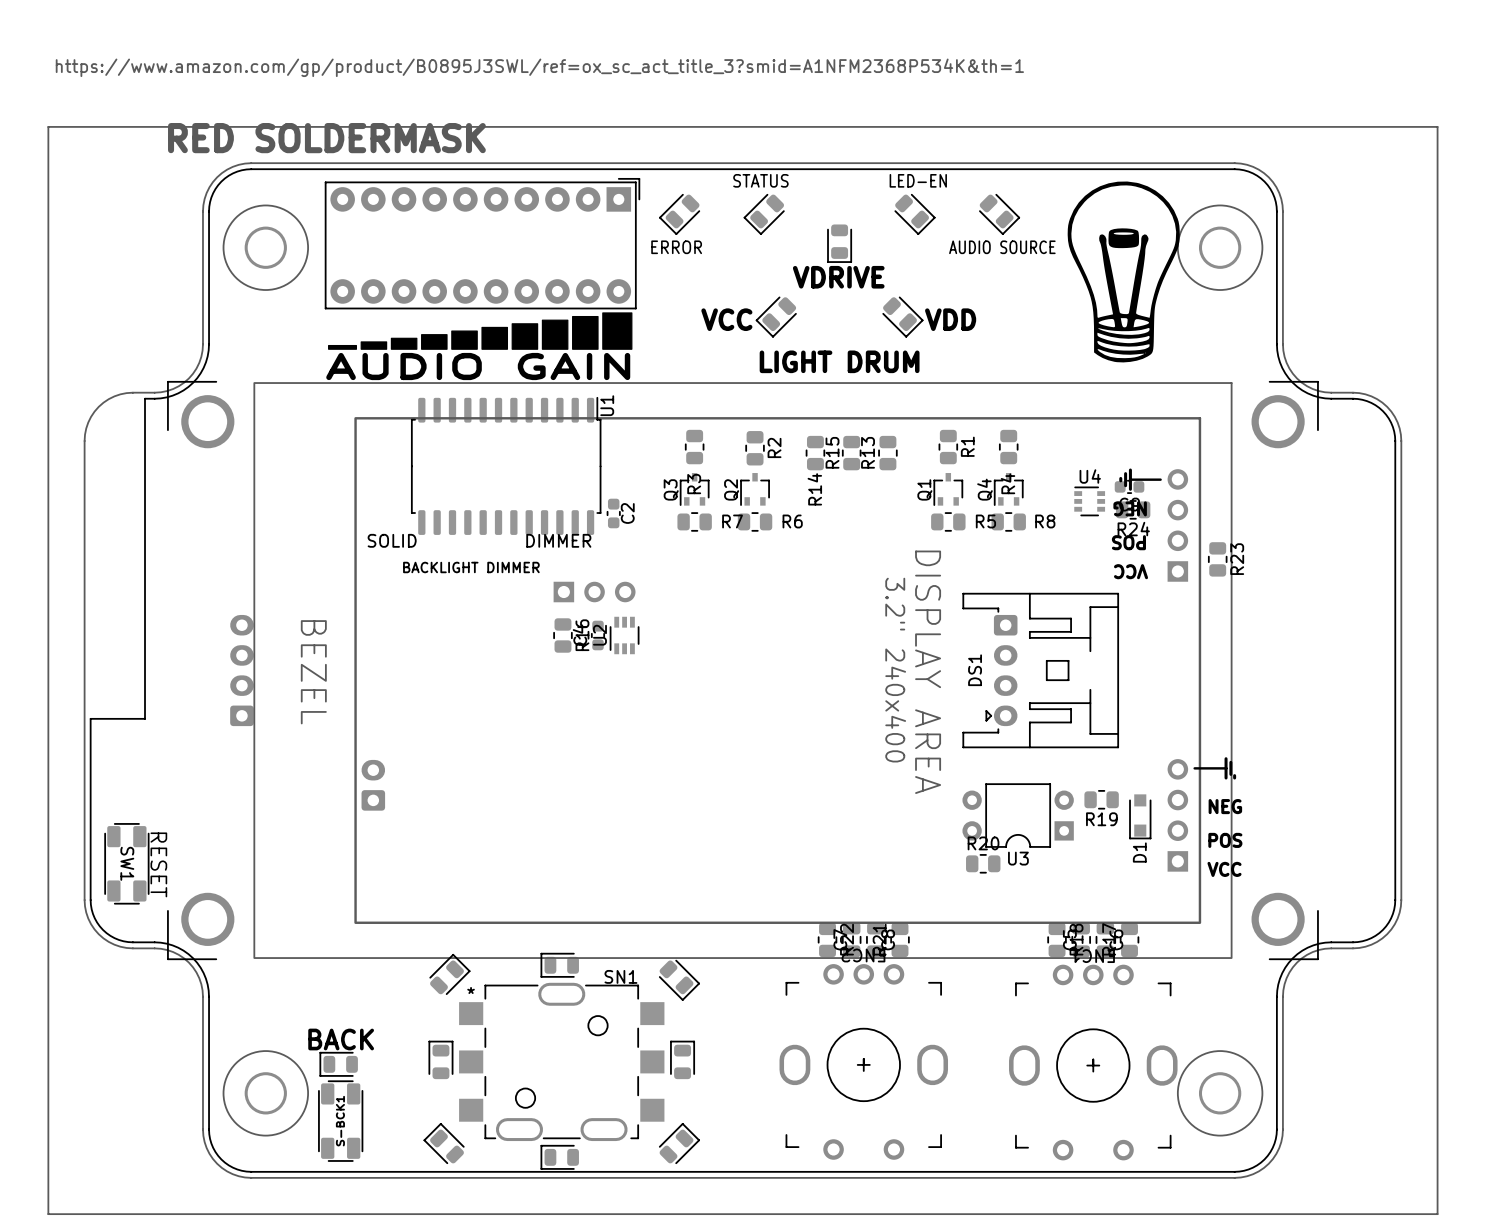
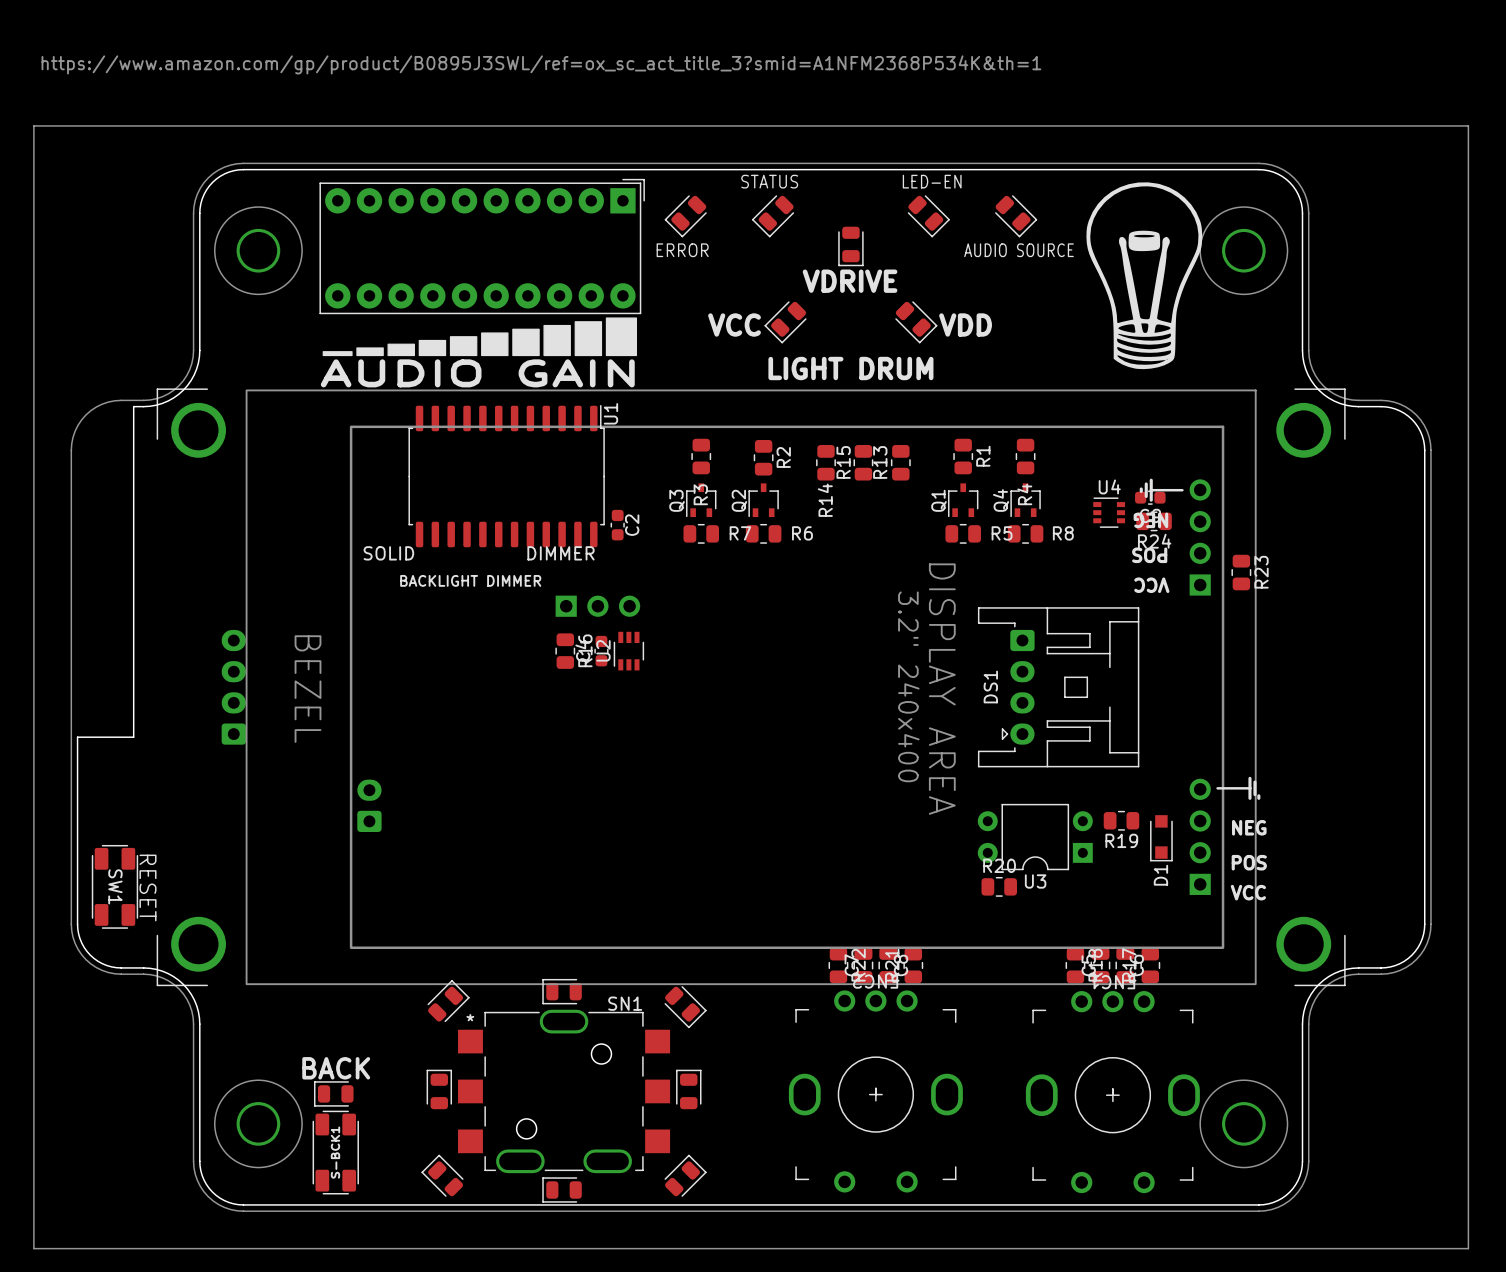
text: RED SOLDERMASK (326, 138) -> none

